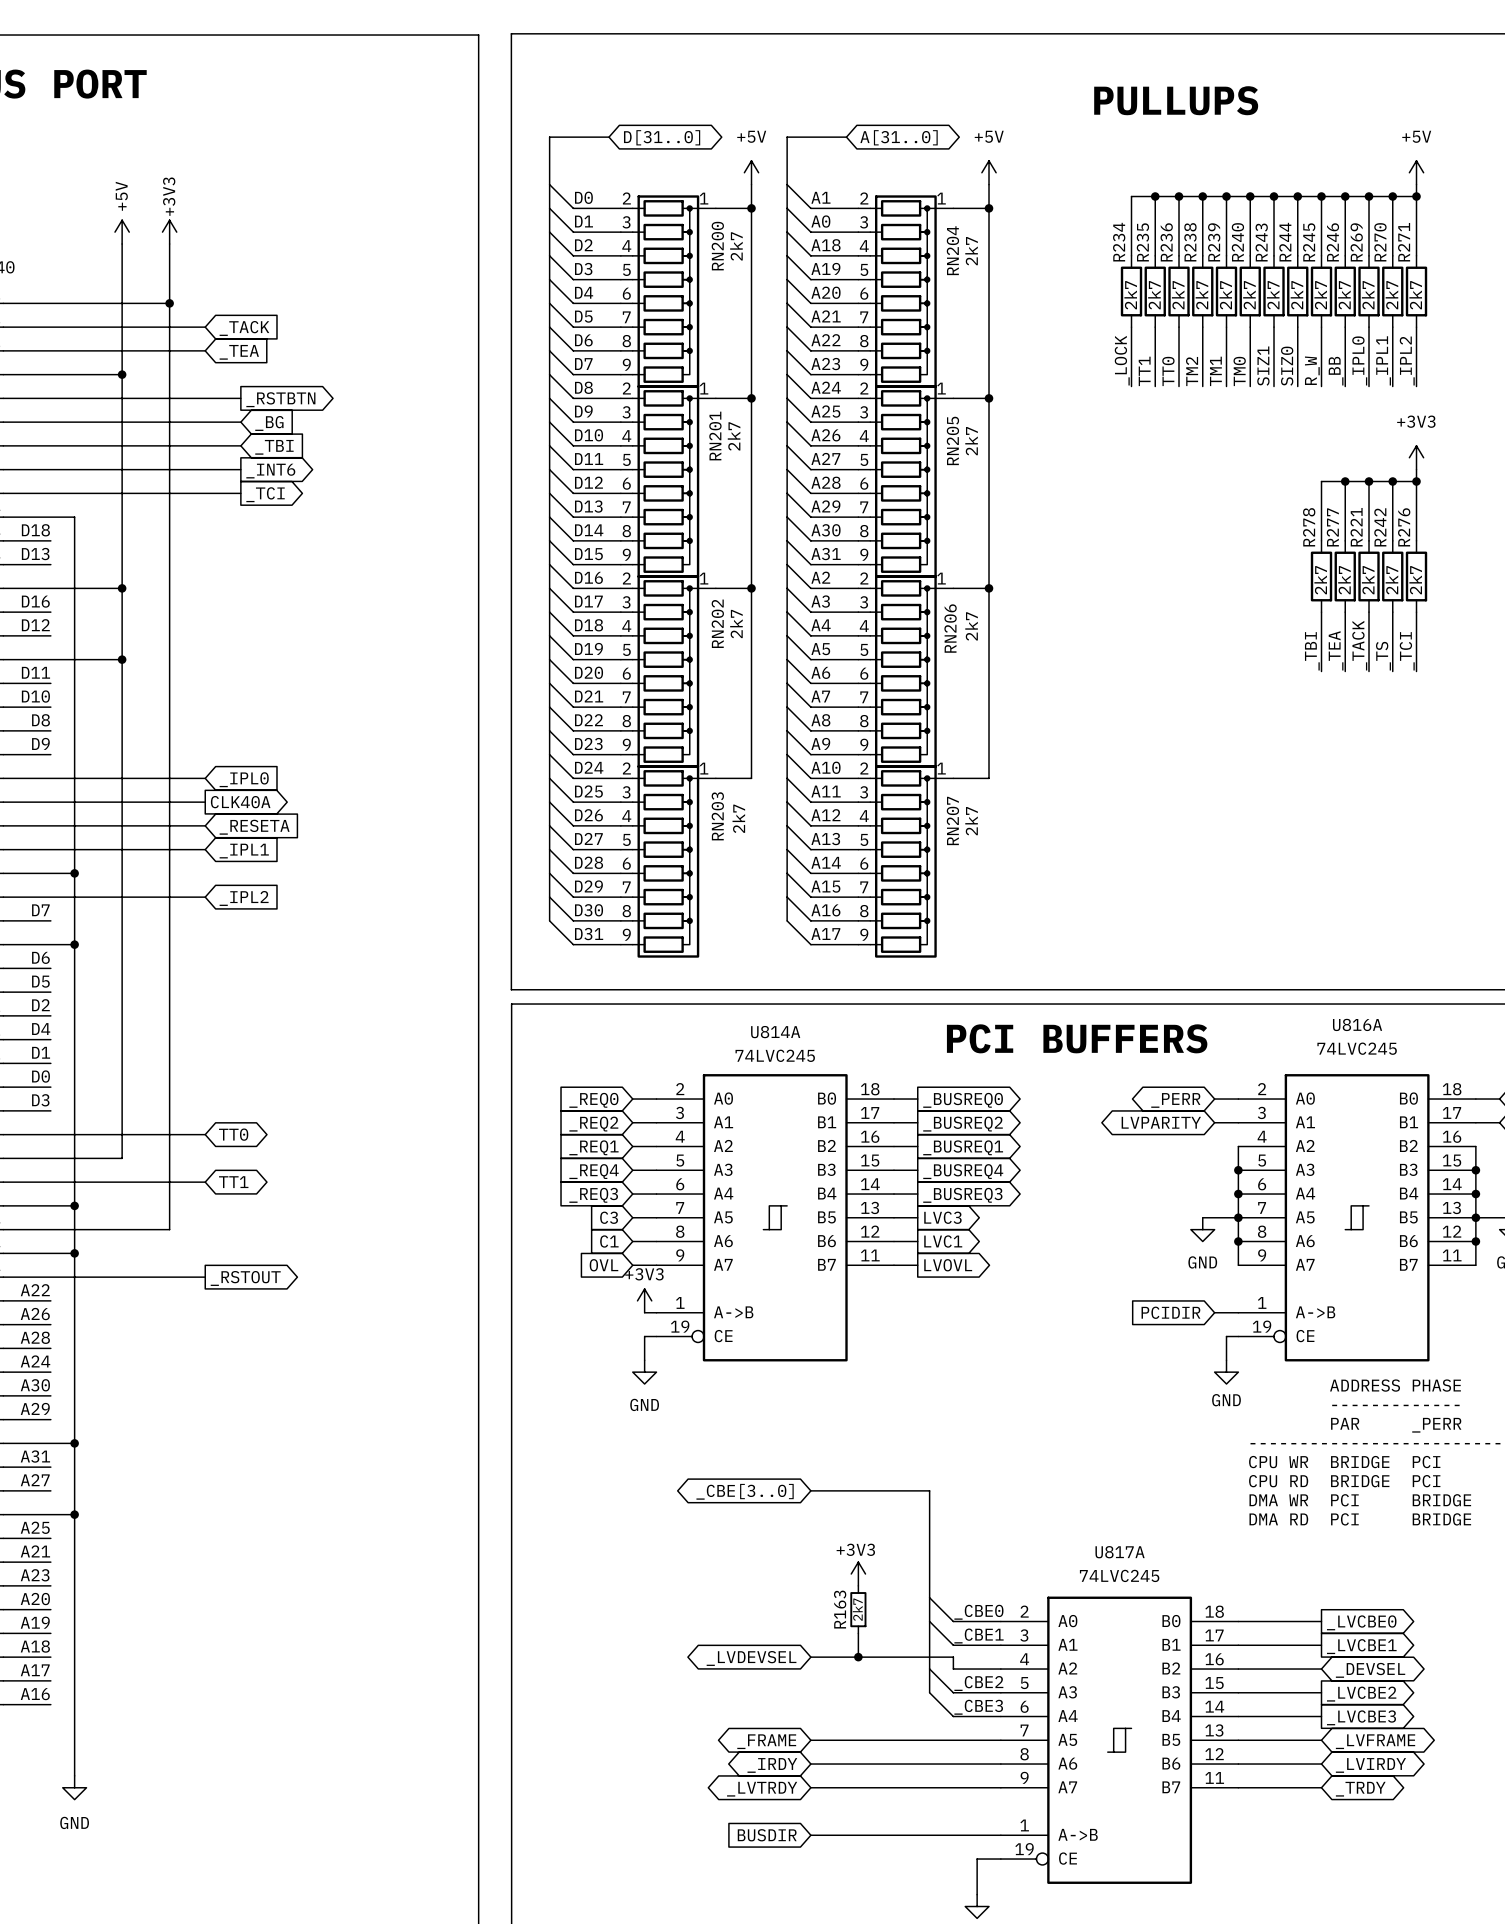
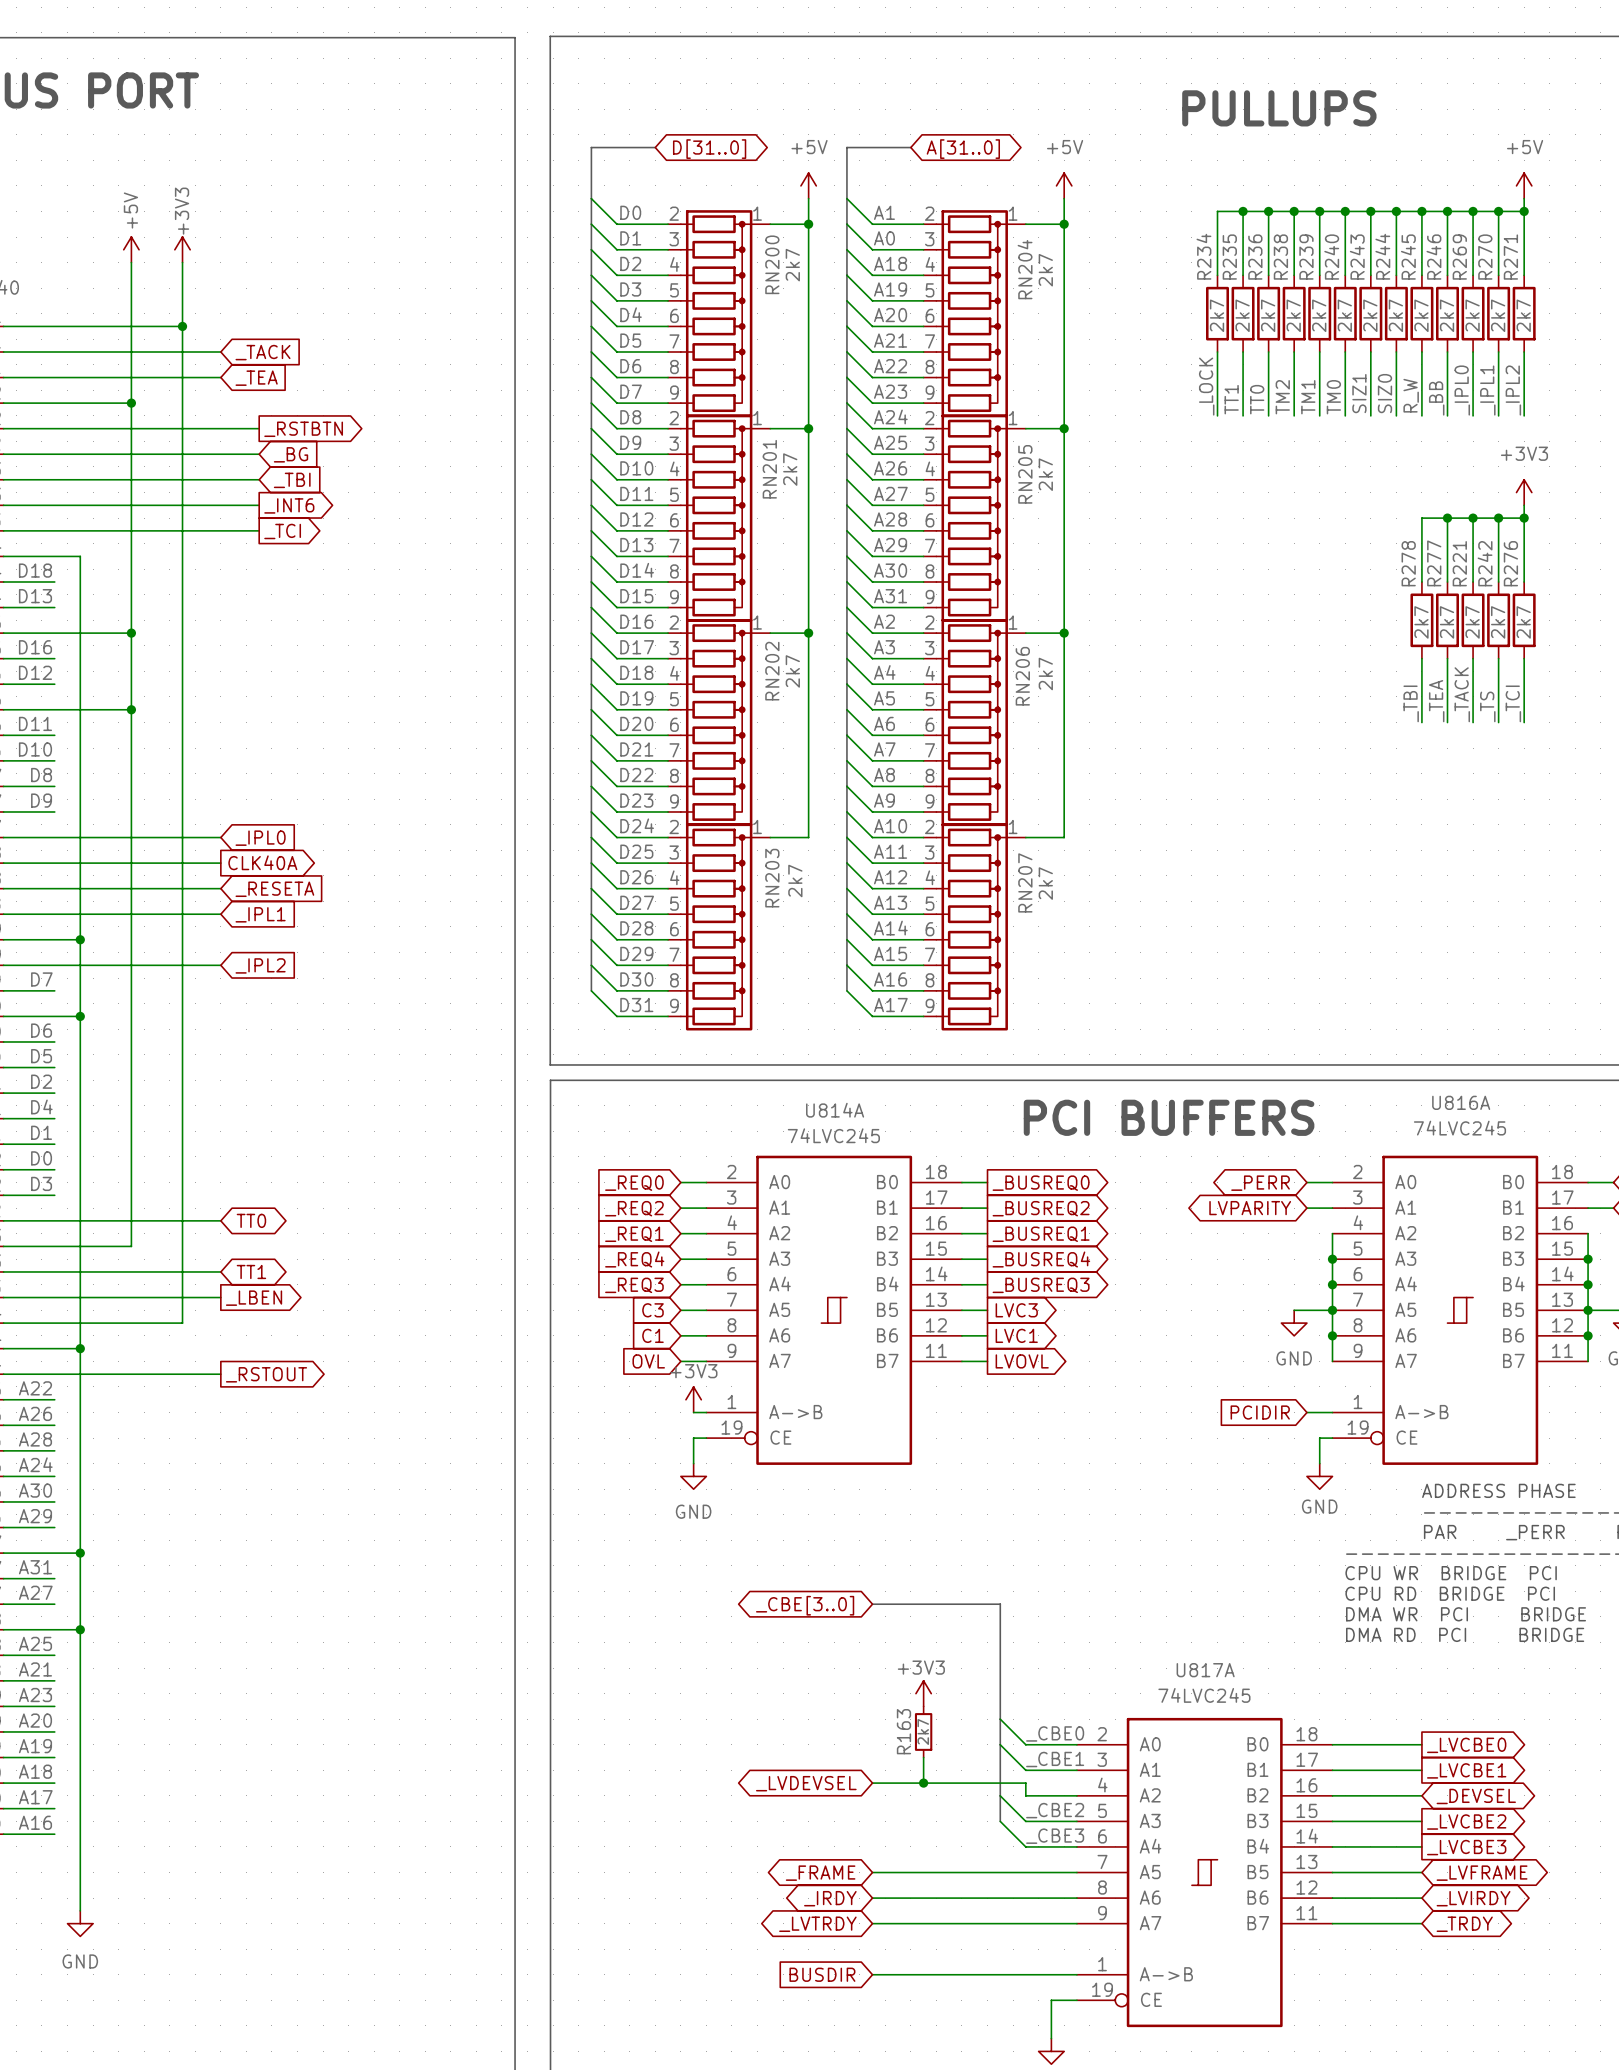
wire: none -> (80, 1297) (220, 1297)
junction: (74, 1205) -> none
global label: none -> _LBEN (254, 1298)

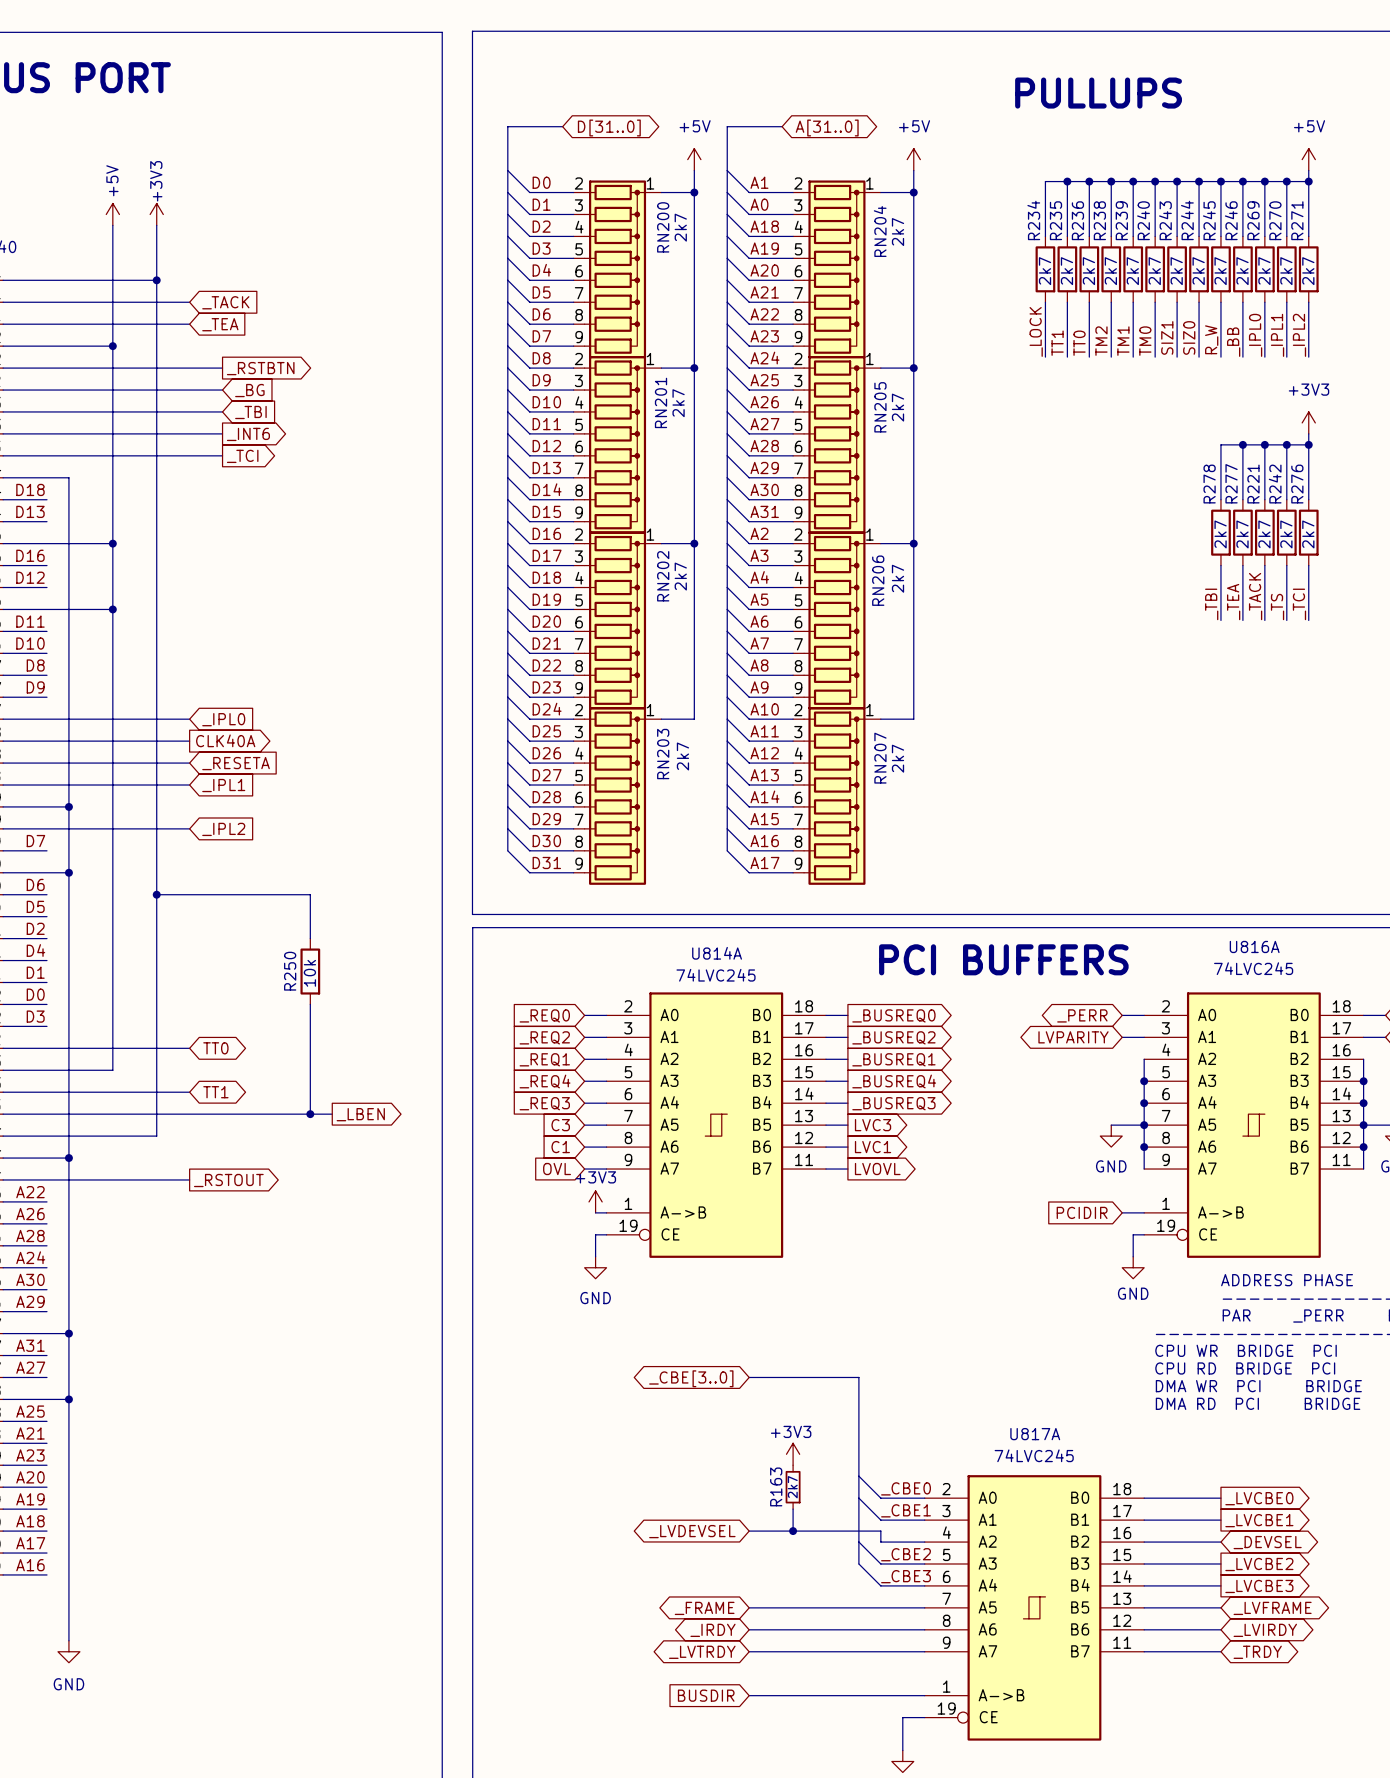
wire: none -> (156, 894) (310, 894) (310, 938)
junction: none -> (156, 894)
R250: none -> 10k (310, 971)
wire: none -> (310, 1004) (310, 1114)
wire: none -> (189, 1114) (332, 1114)
junction: none -> (310, 1114)
global label position: _LBEN (254, 1298) -> _LBEN (360, 1114)

